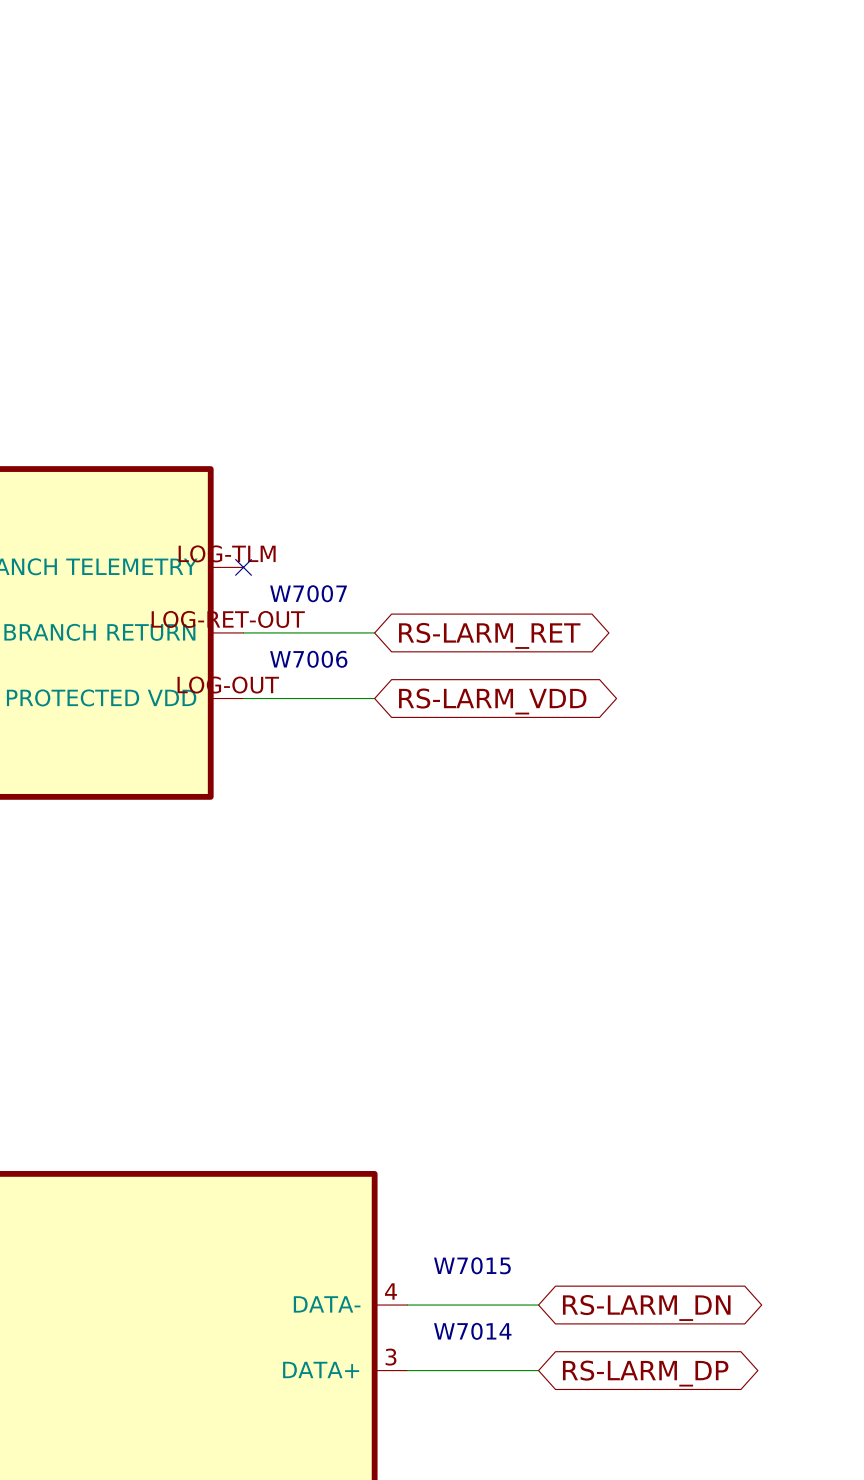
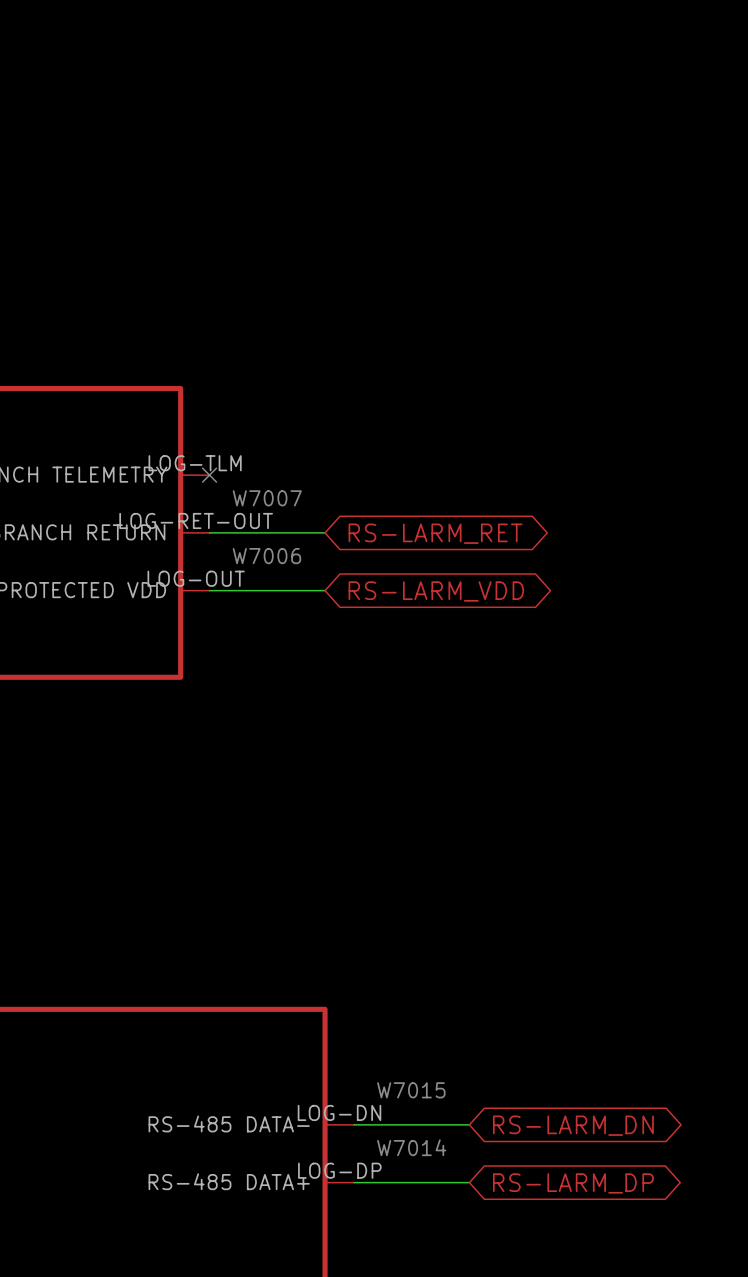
part pin number: 4 (390, 1291) -> LOG-DN (339, 1112)
part pin name: DATA- (327, 1304) -> RS-485 DATA- (229, 1123)
part pin number: 3 (391, 1357) -> LOG-DP (339, 1170)
part pin name: DATA+ (321, 1369) -> RS-485 DATA+ (229, 1181)

